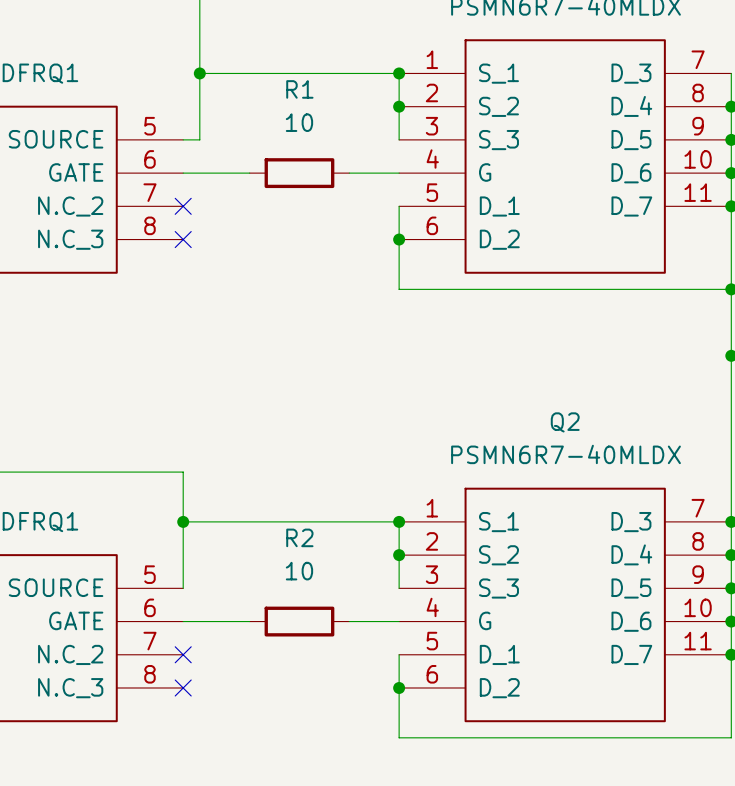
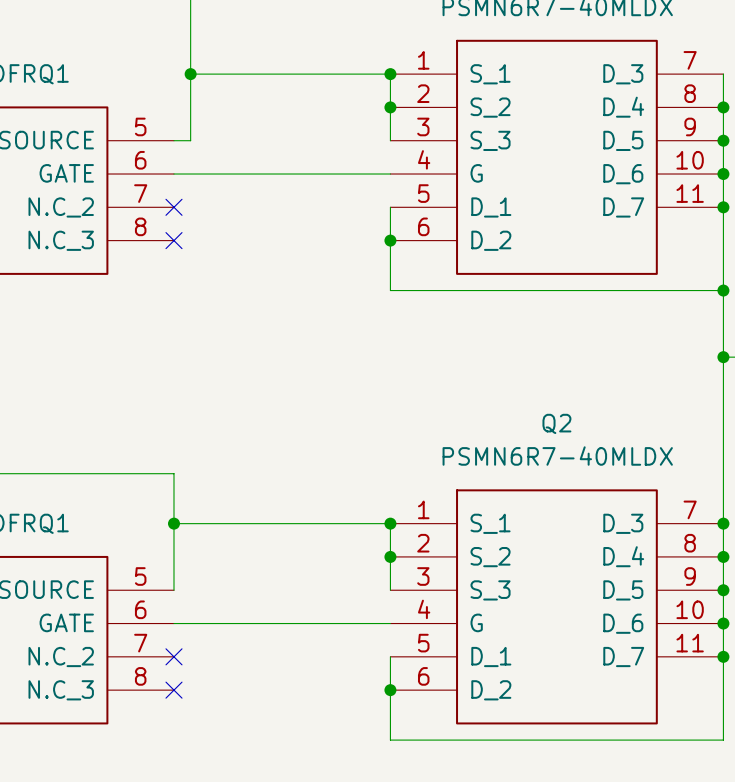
wire: none -> (240, 174) (340, 174)
R1: 10 (299, 173) -> none
wire: none -> (240, 623) (340, 623)
R2: 10 (299, 621) -> none

